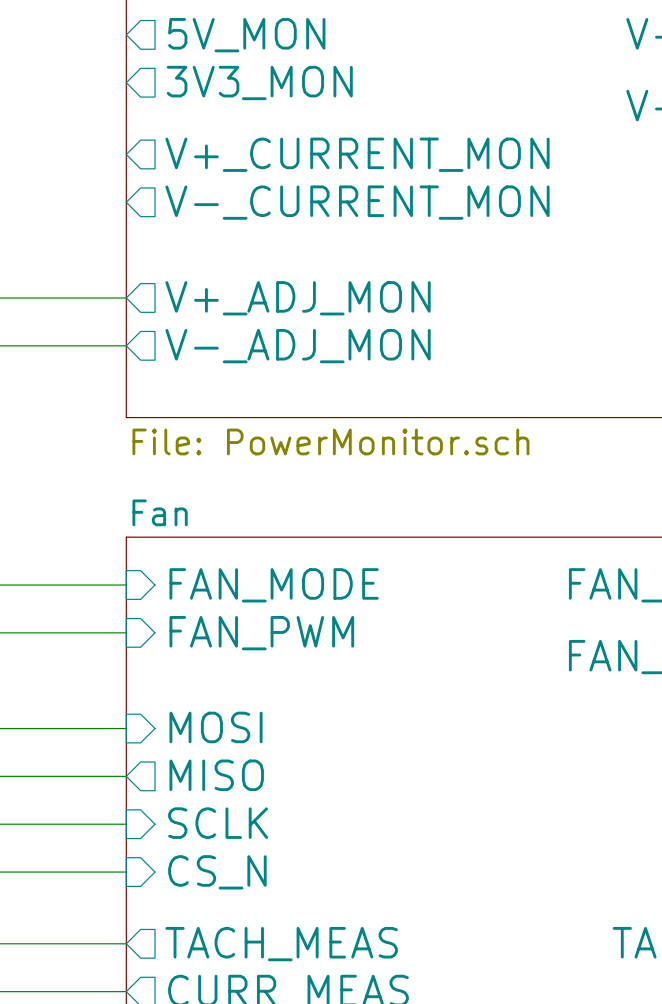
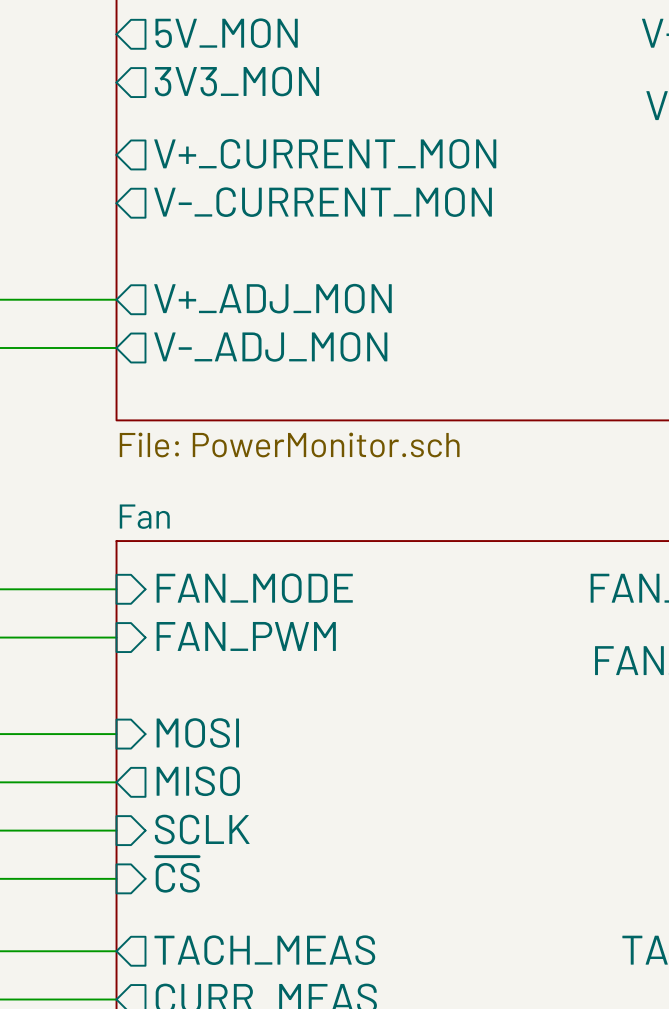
sheet pin: CS_N (217, 872) -> ~{CS} (177, 874)

